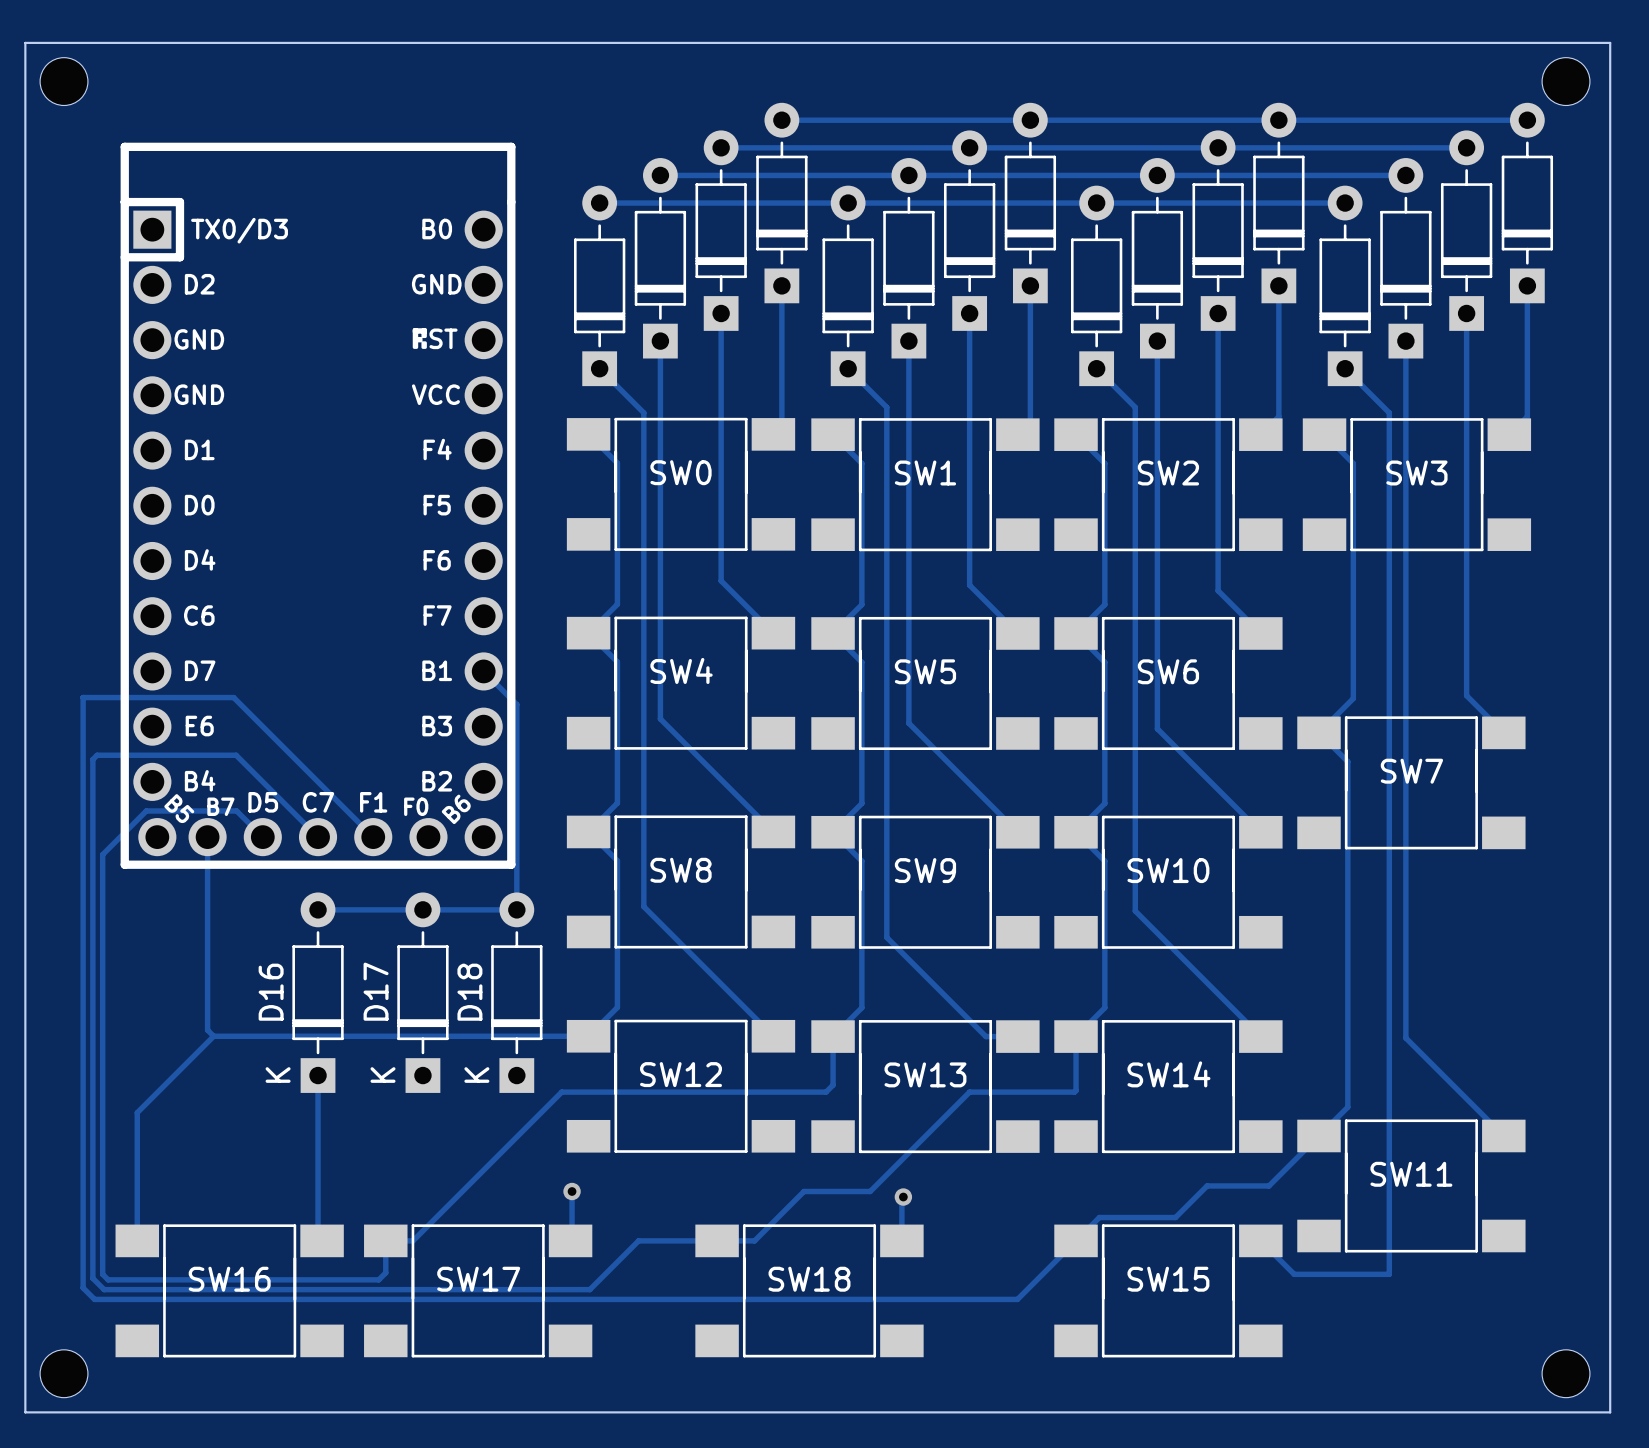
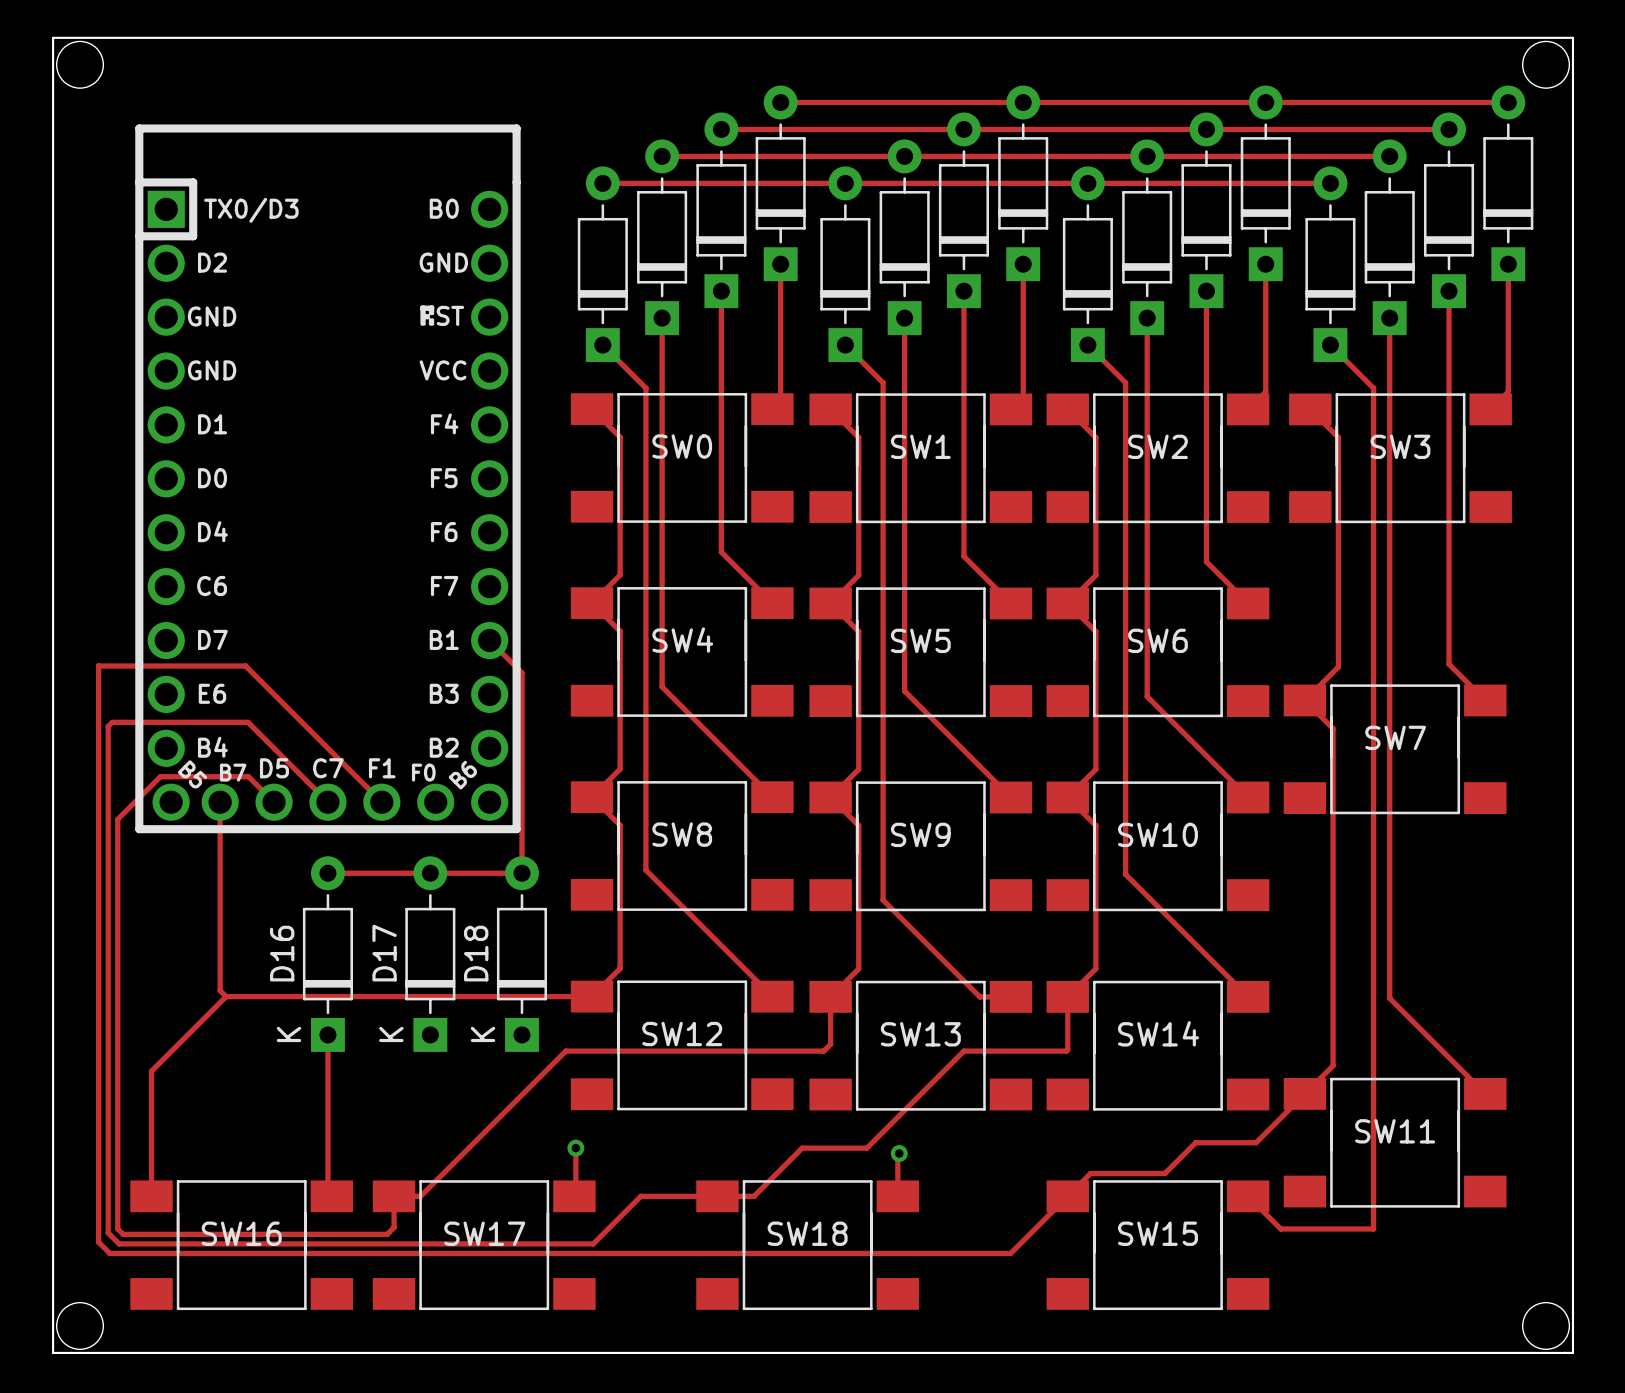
board edge: (25, 42) (1610, 42) (1610, 1412) (25, 1412) (25, 42) -> (53, 37) (53, 1352) (1572, 1352) (1572, 37) (53, 37)

